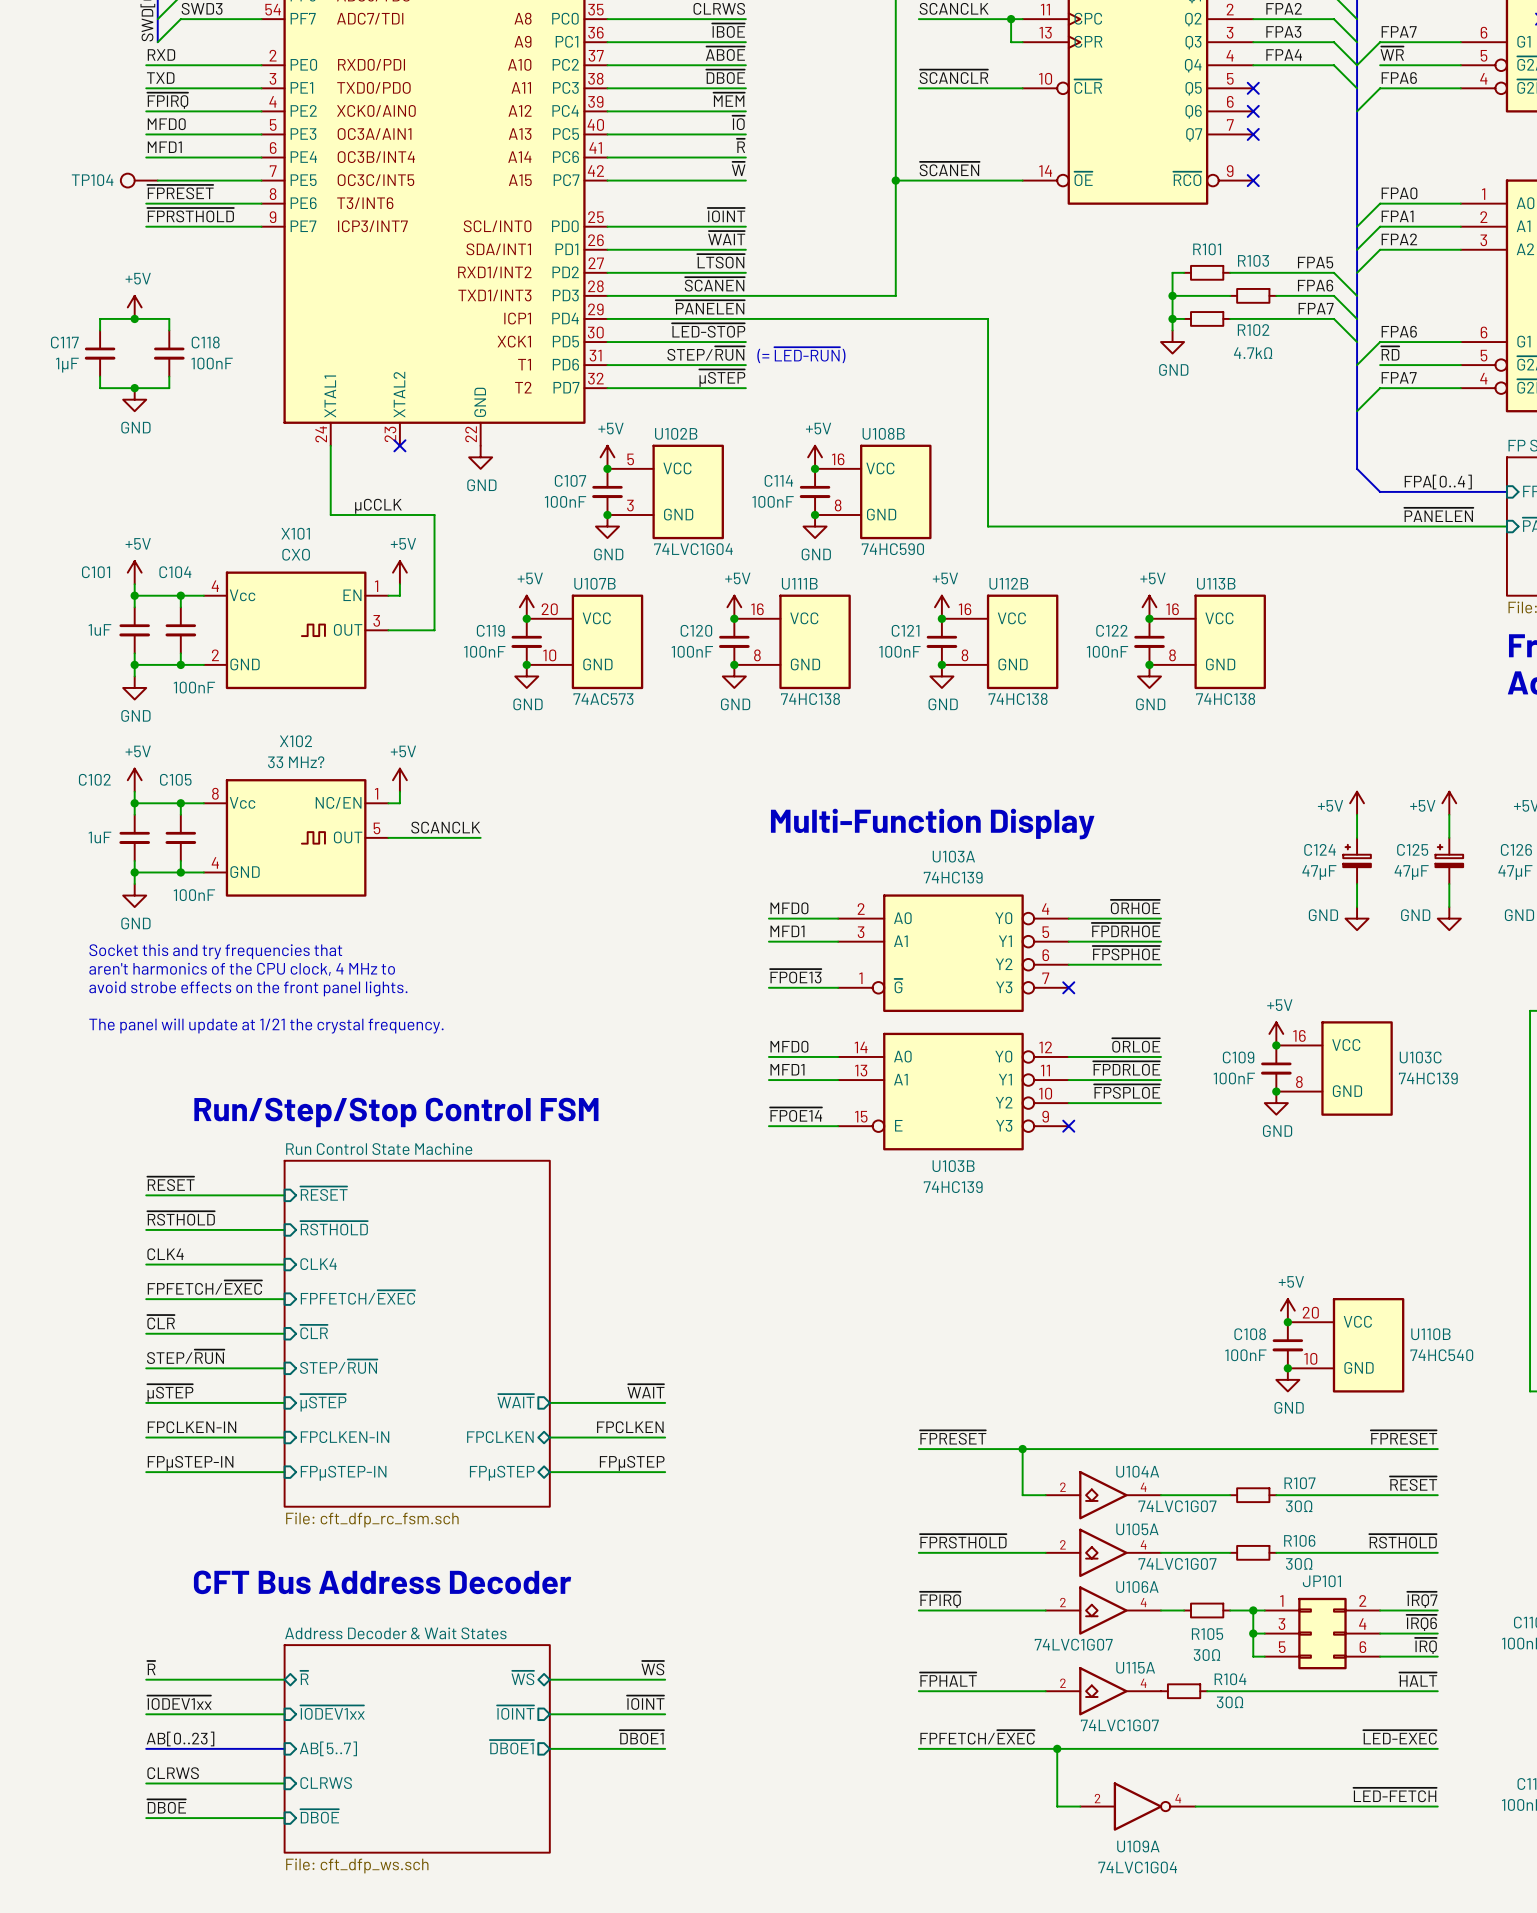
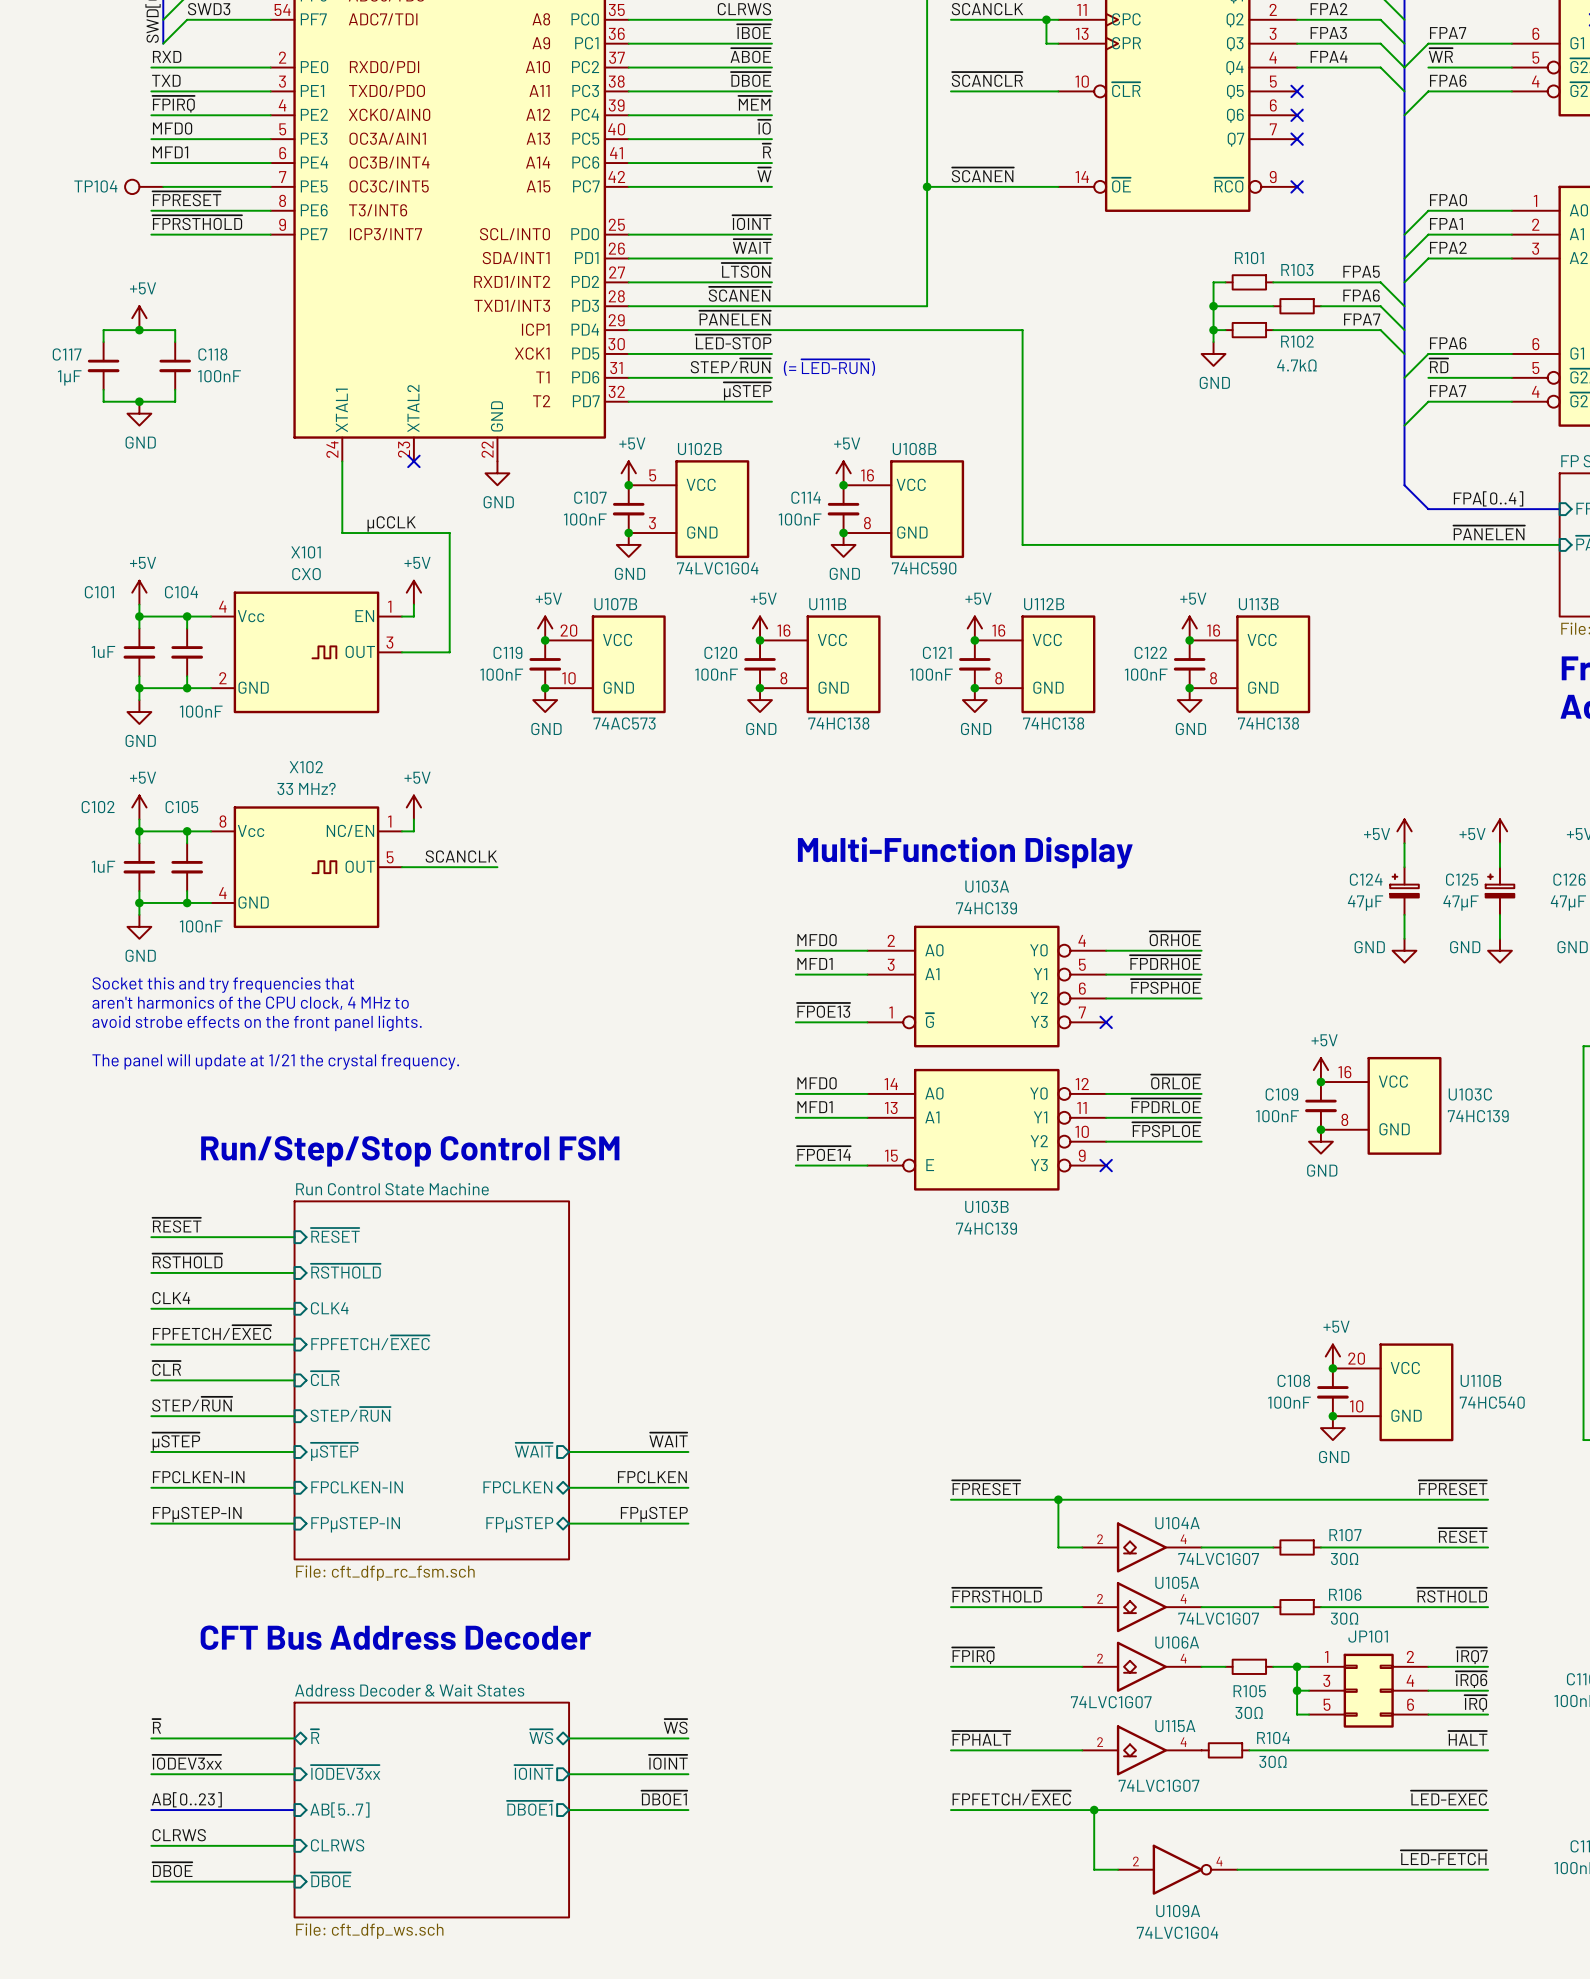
label: ~{IODEV1xx} (179, 1702) -> ~{IODEV3xx} (187, 1762)
sheet pin: ~{IODEV1xx} (332, 1712) -> ~{IODEV3xx} (345, 1772)

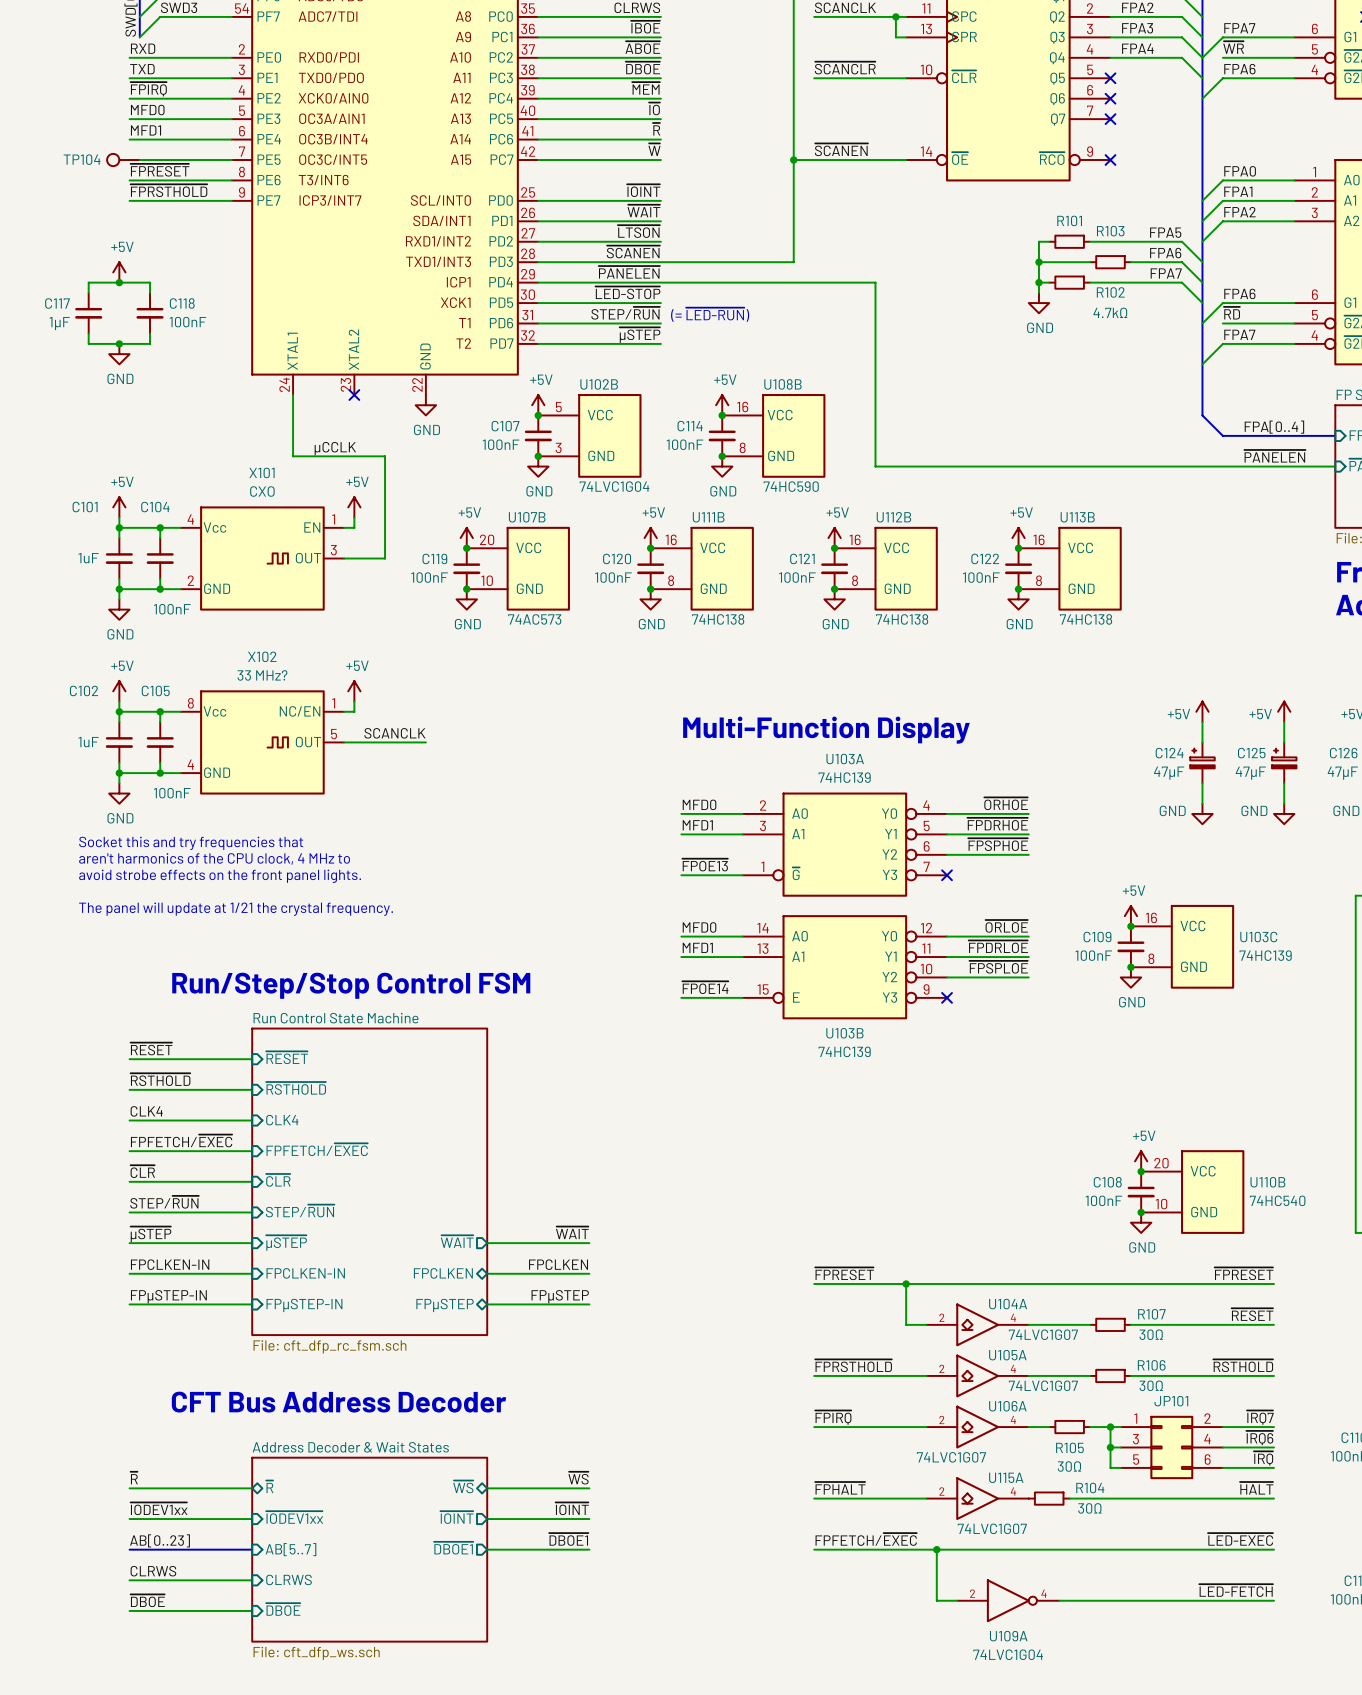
label: ~{IODEV3xx} (187, 1762) -> ~{IODEV1xx} (159, 1508)
sheet pin: ~{IODEV3xx} (345, 1772) -> ~{IODEV1xx} (294, 1517)

